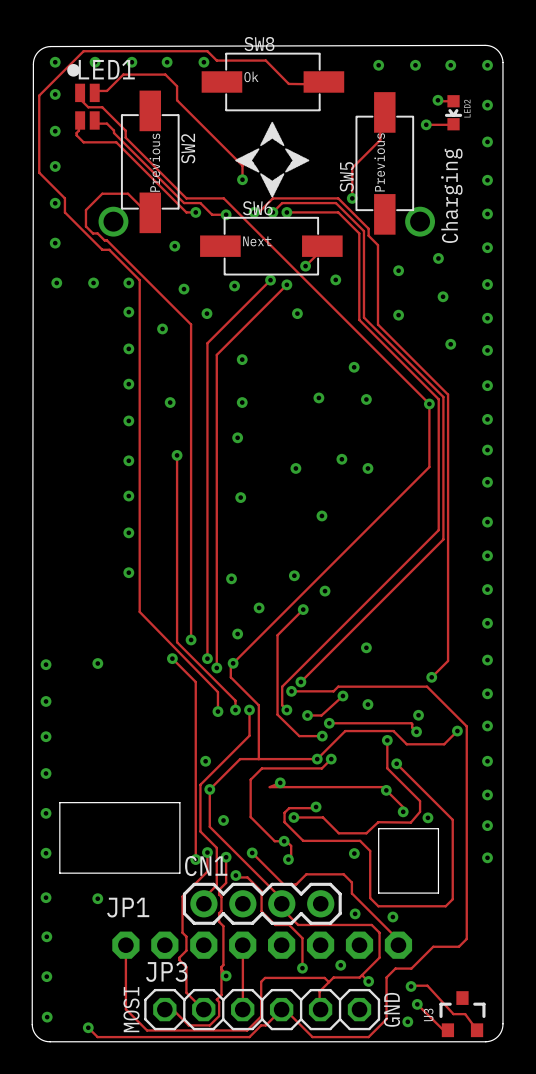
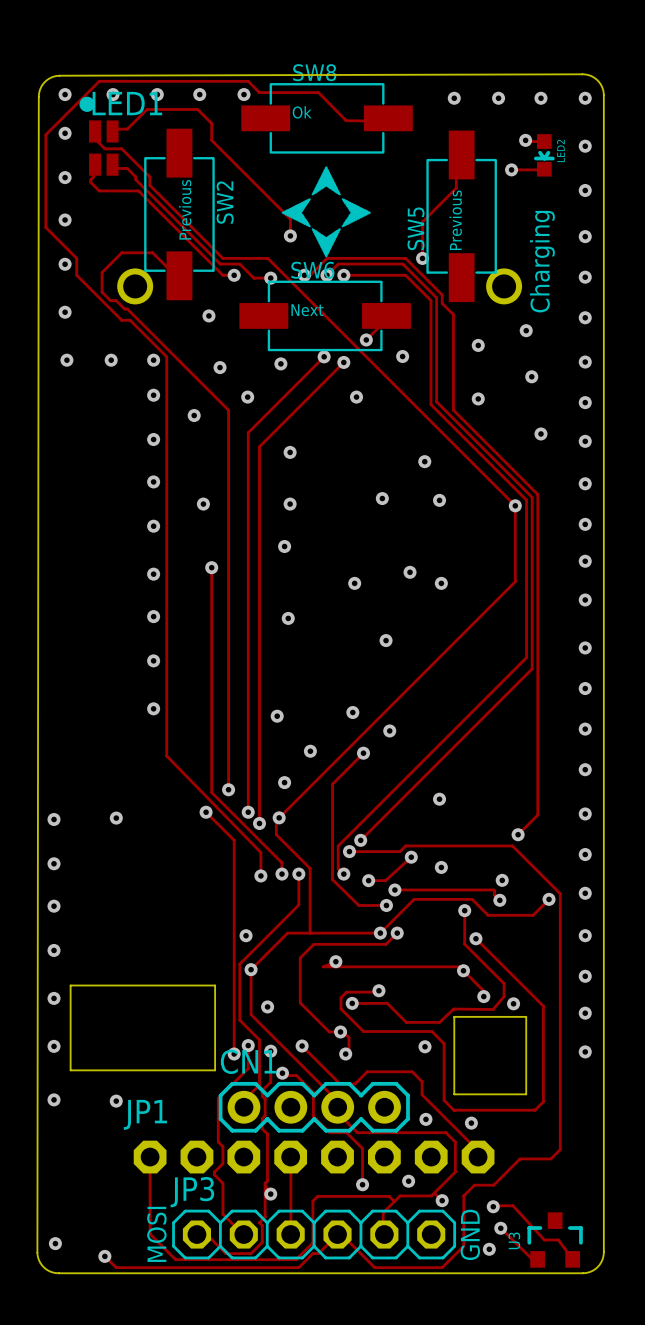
via: (46, 936) -> none
via: (46, 976) -> none

